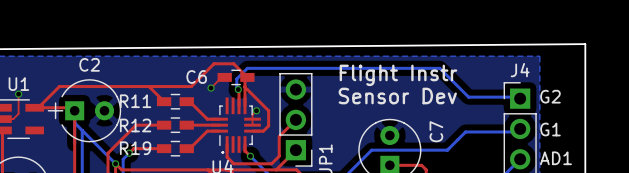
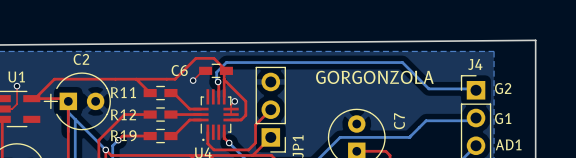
text: Flight Instr (398, 75) -> none
text: none -> GORGONZOLA (374, 77)
text: Sensor Dev (397, 96) -> none

